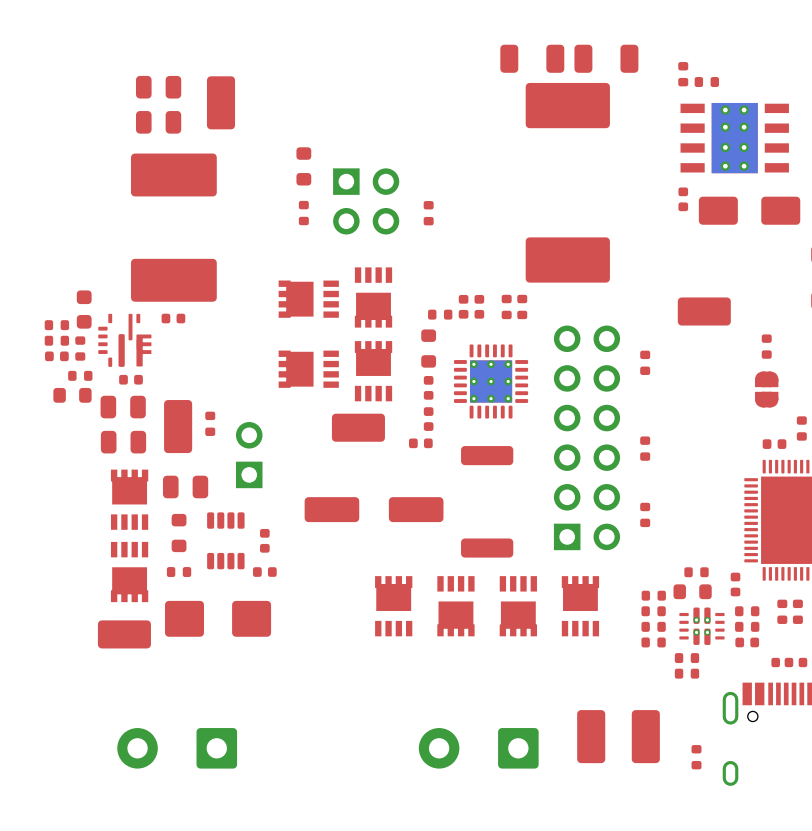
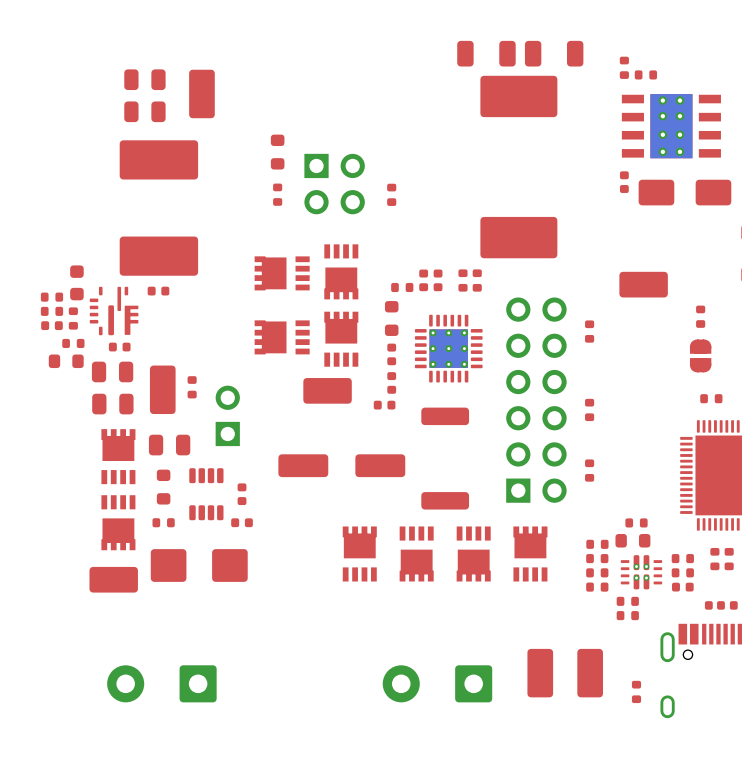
part: (801, 428) -> none
part footprint: [762, 439, 787, 449] -> [700, 394, 723, 404]
part: (735, 584) -> none

